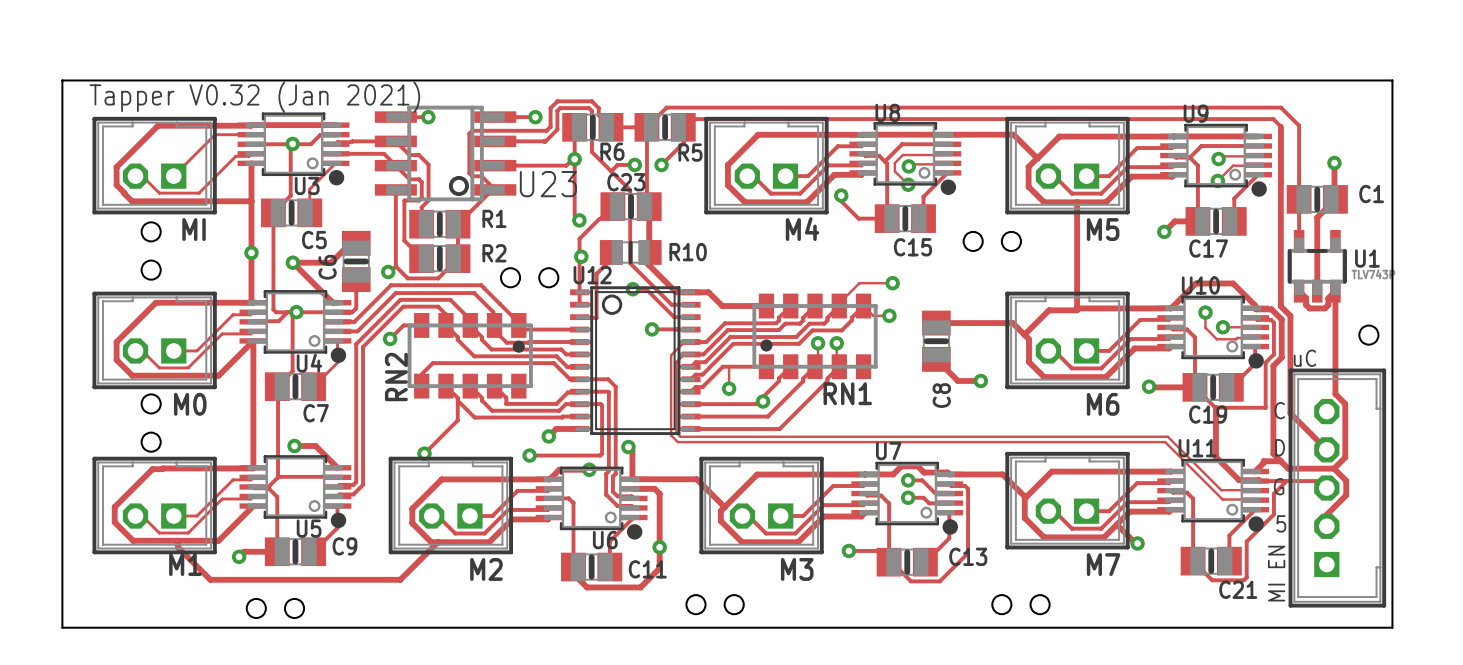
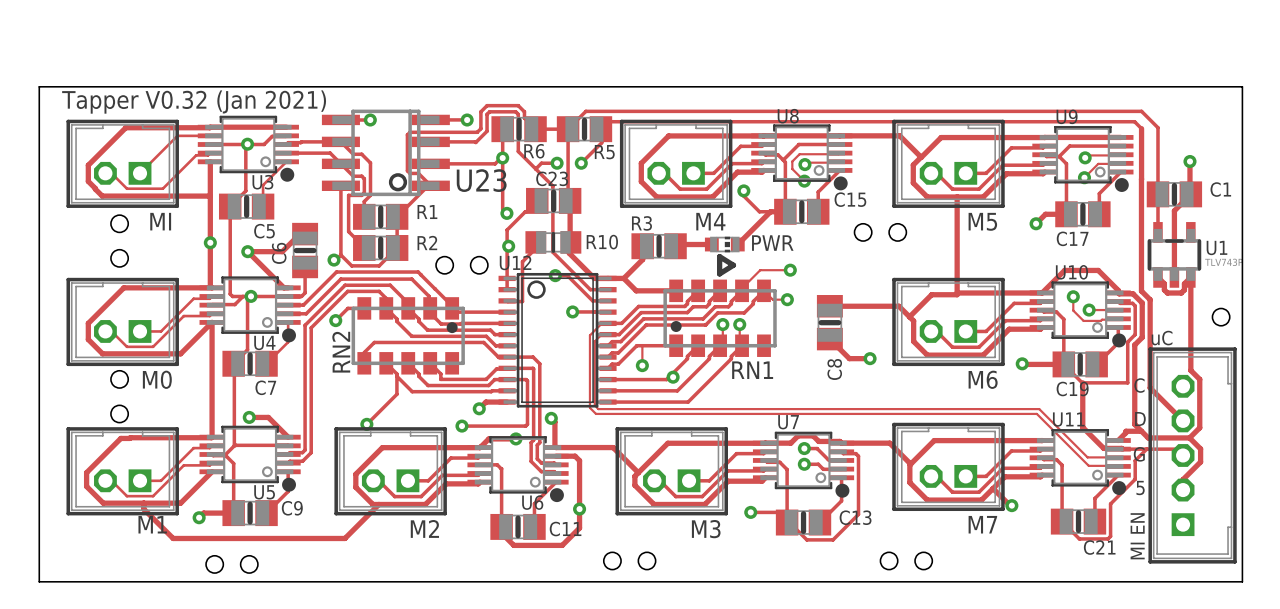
track: none -> (785, 211) (770, 211) (737, 244)
C15 name position: C15 (912, 247) -> C15 (850, 199)
track: none -> (711, 244) (677, 244) (675, 246)
PWR: none -> (724, 244)
track: none -> (642, 246) (642, 259) (623, 278)
R3: none -> (659, 246)
line: none -> (719, 256) (719, 273) (733, 265) (719, 256)

